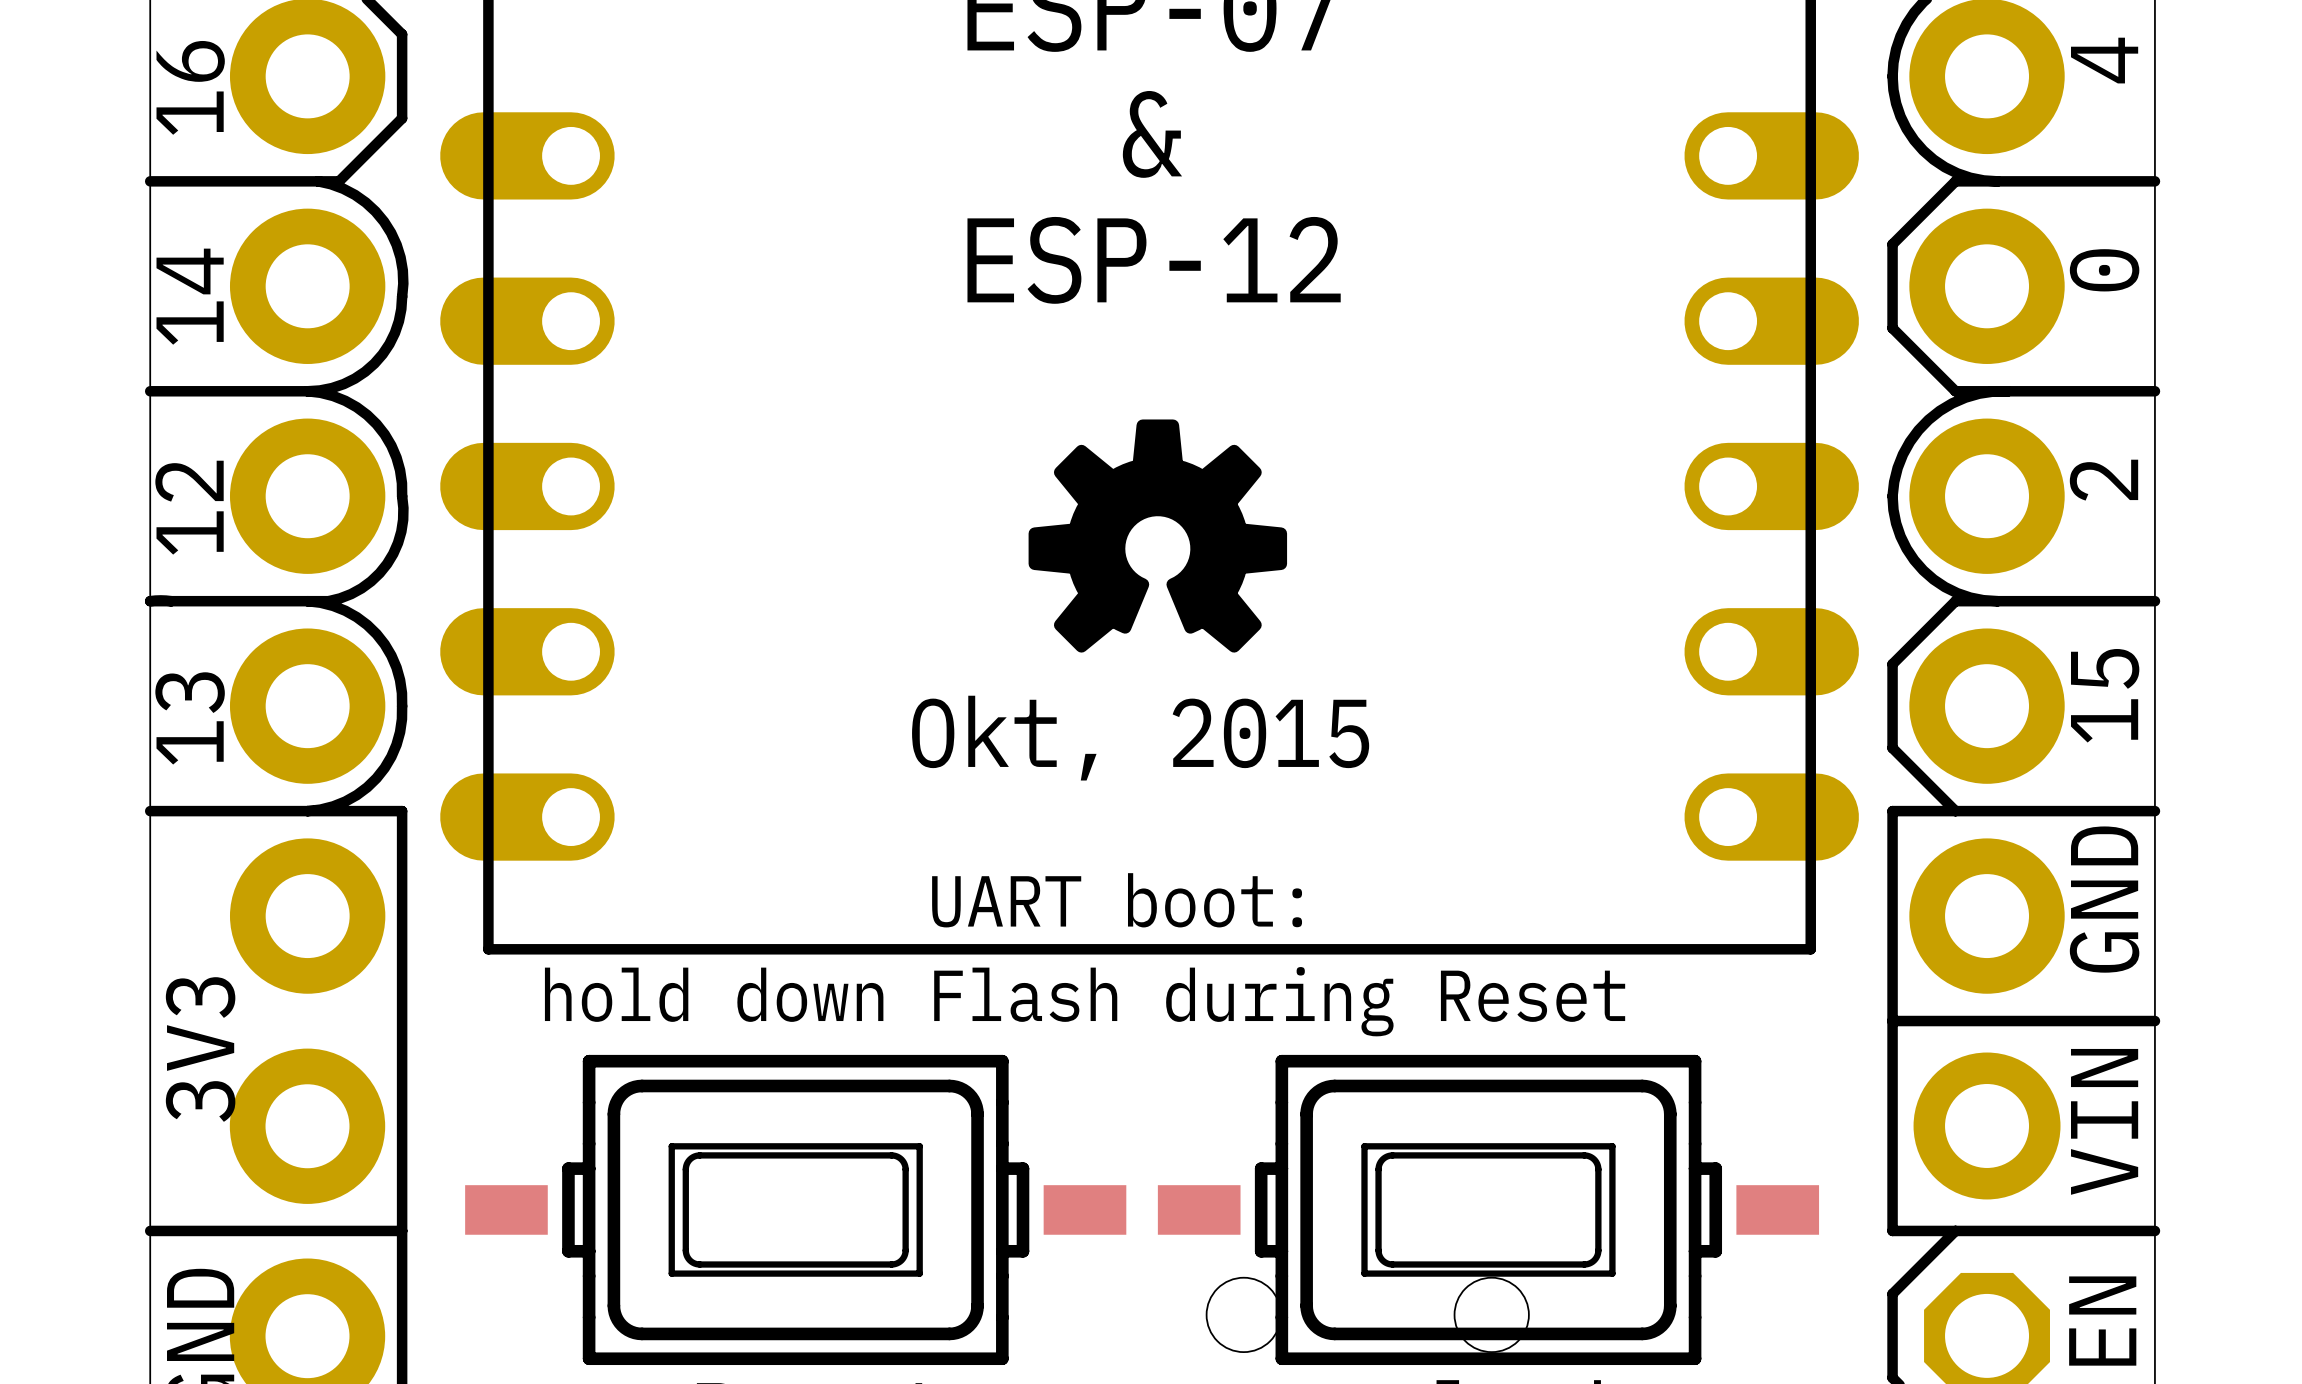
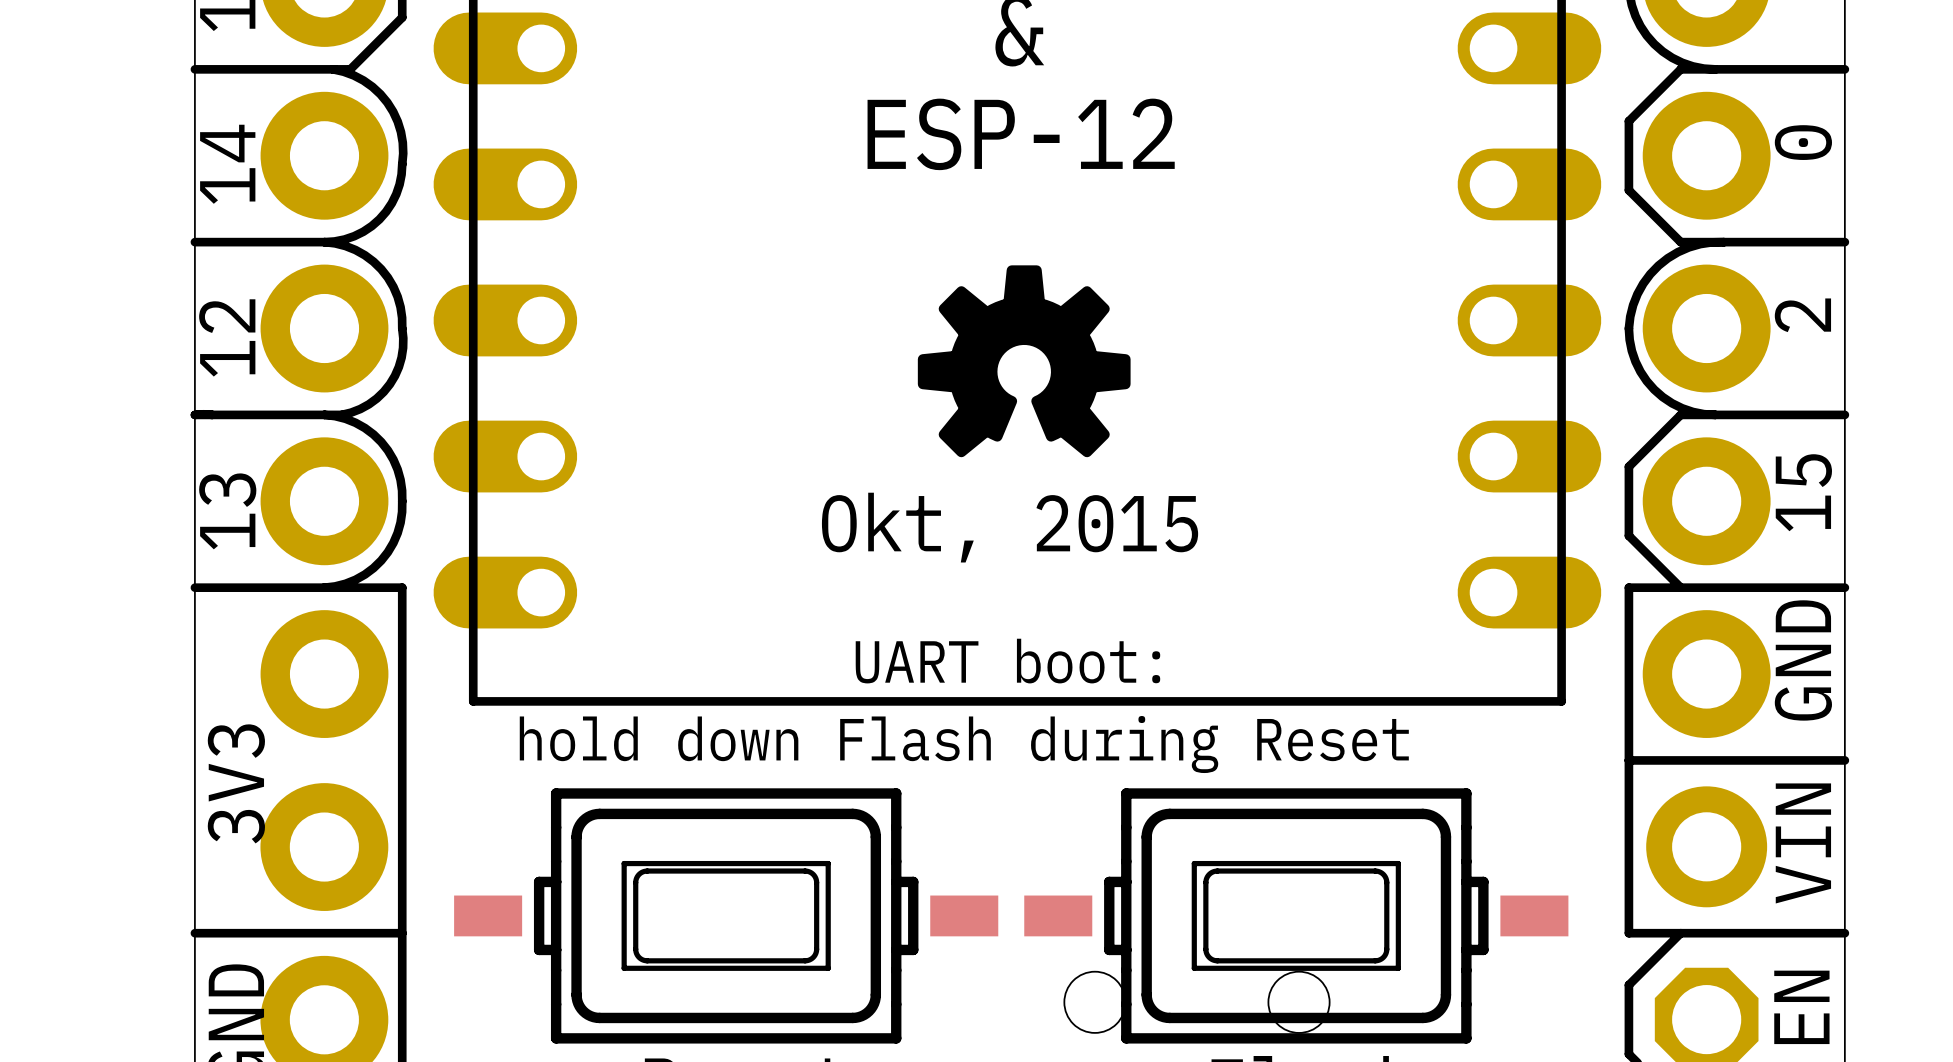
text position: UART boot: (1117, 900) -> UART boot: (1007, 661)

